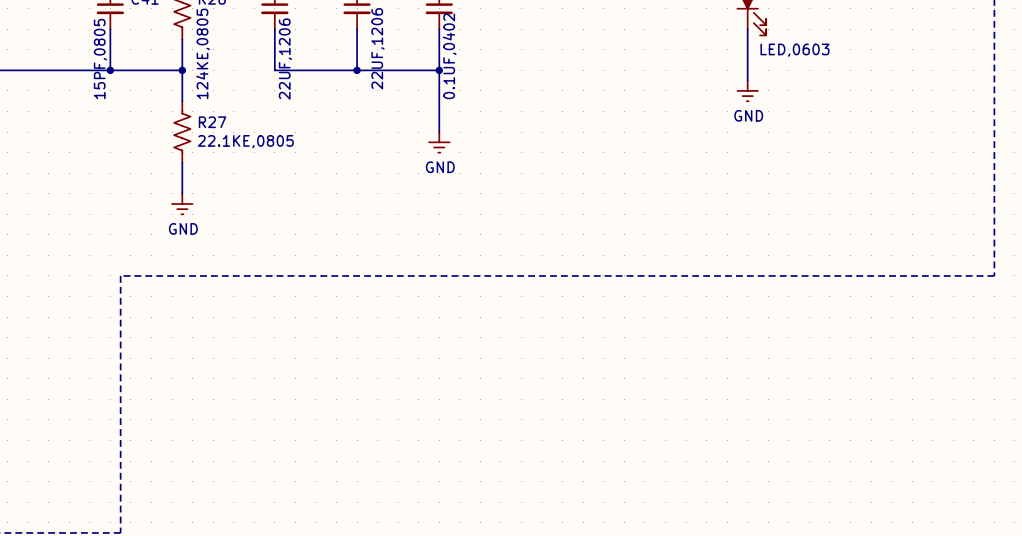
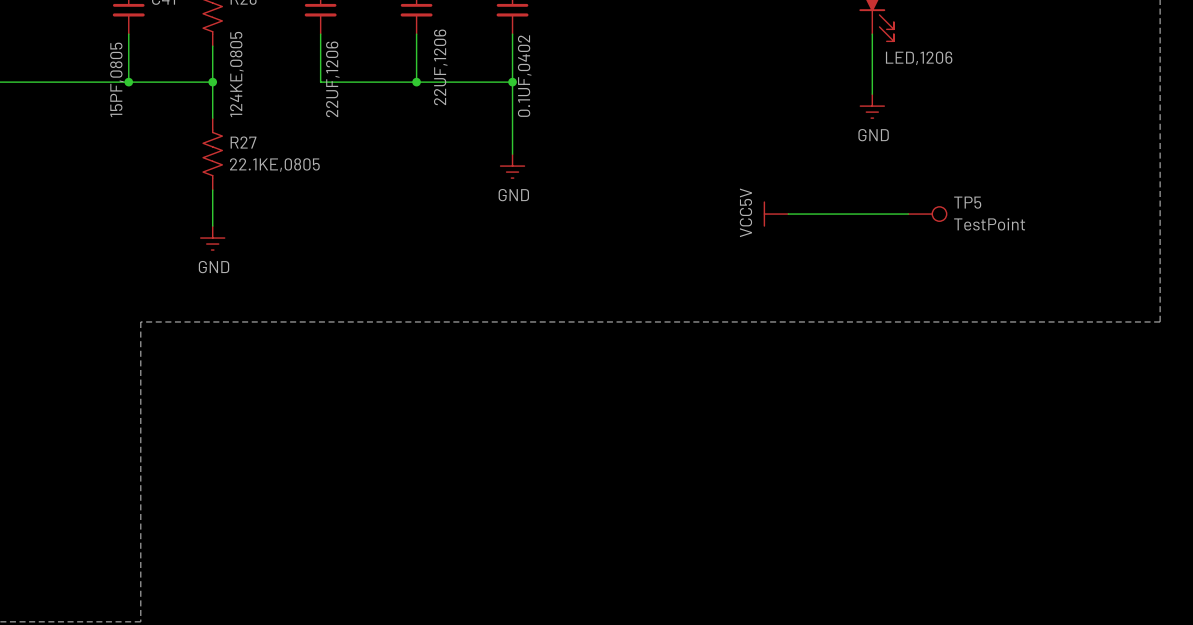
part value: LED,0603 (794, 50) -> LED,1206 (919, 58)
power symbol: none -> VCC5V (776, 214)
wire: none -> (788, 214) (908, 214)
TP5: none -> TestPoint (927, 214)

